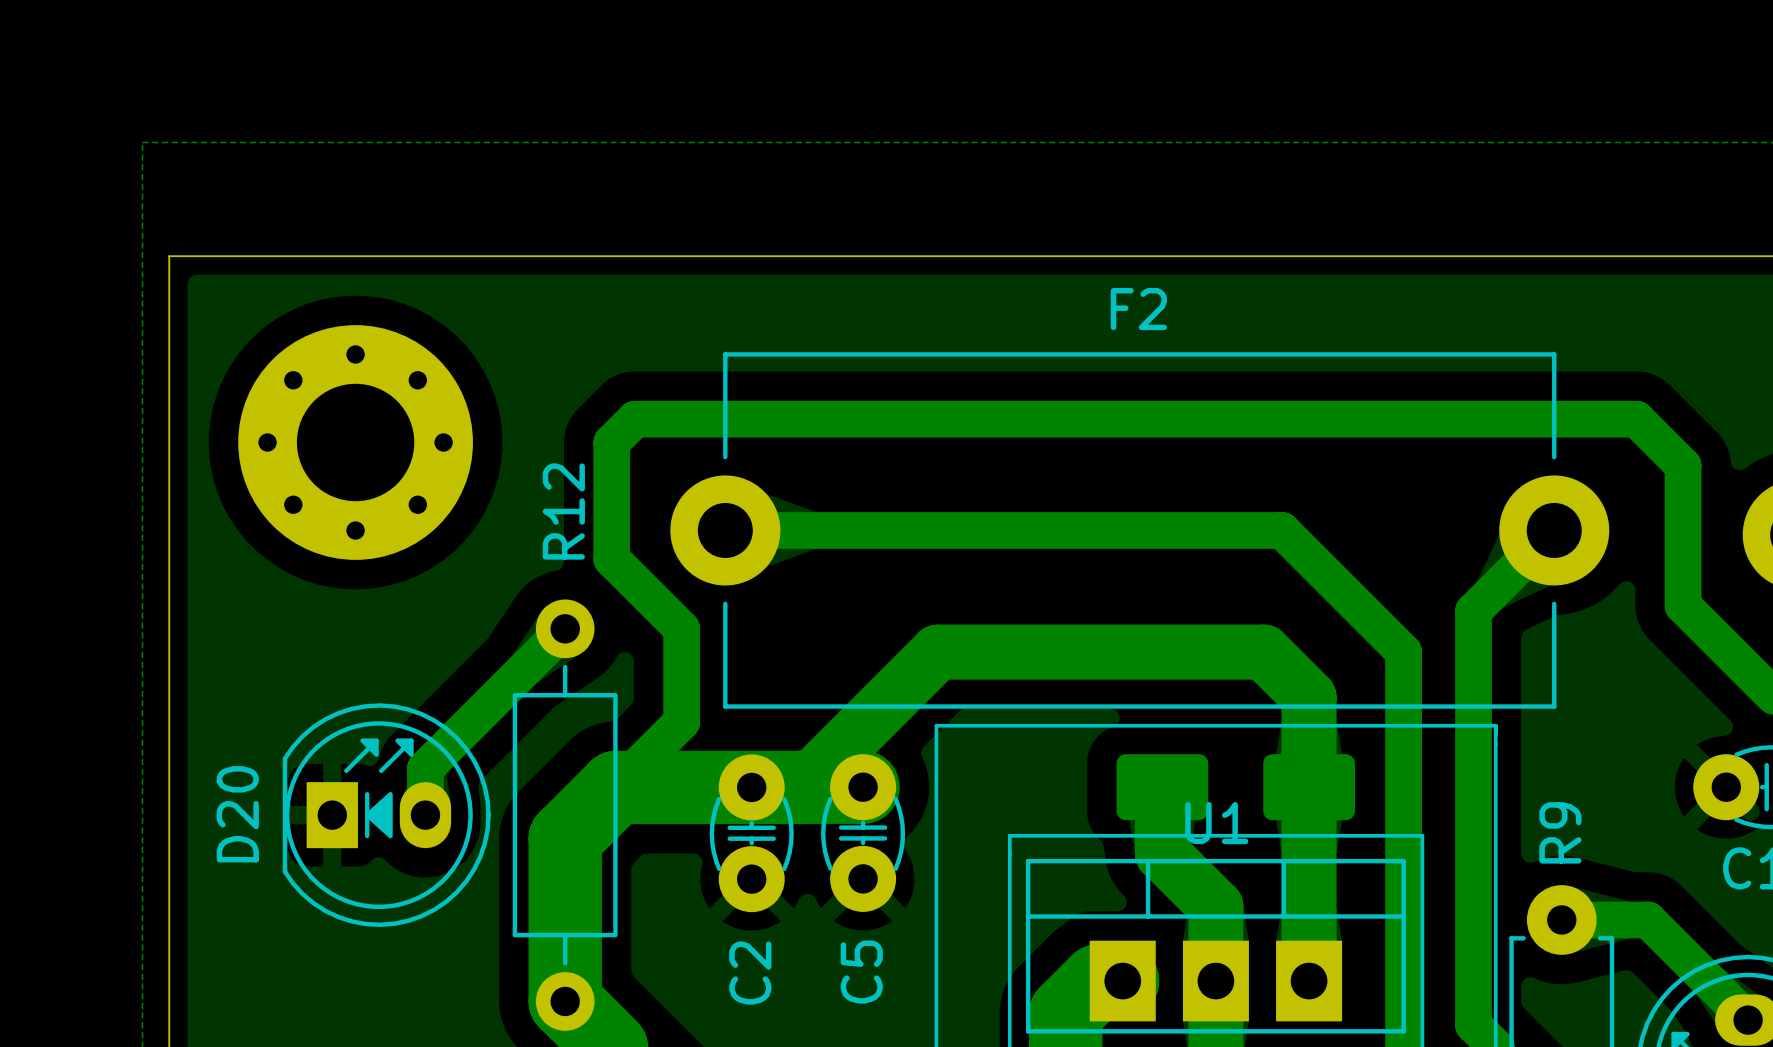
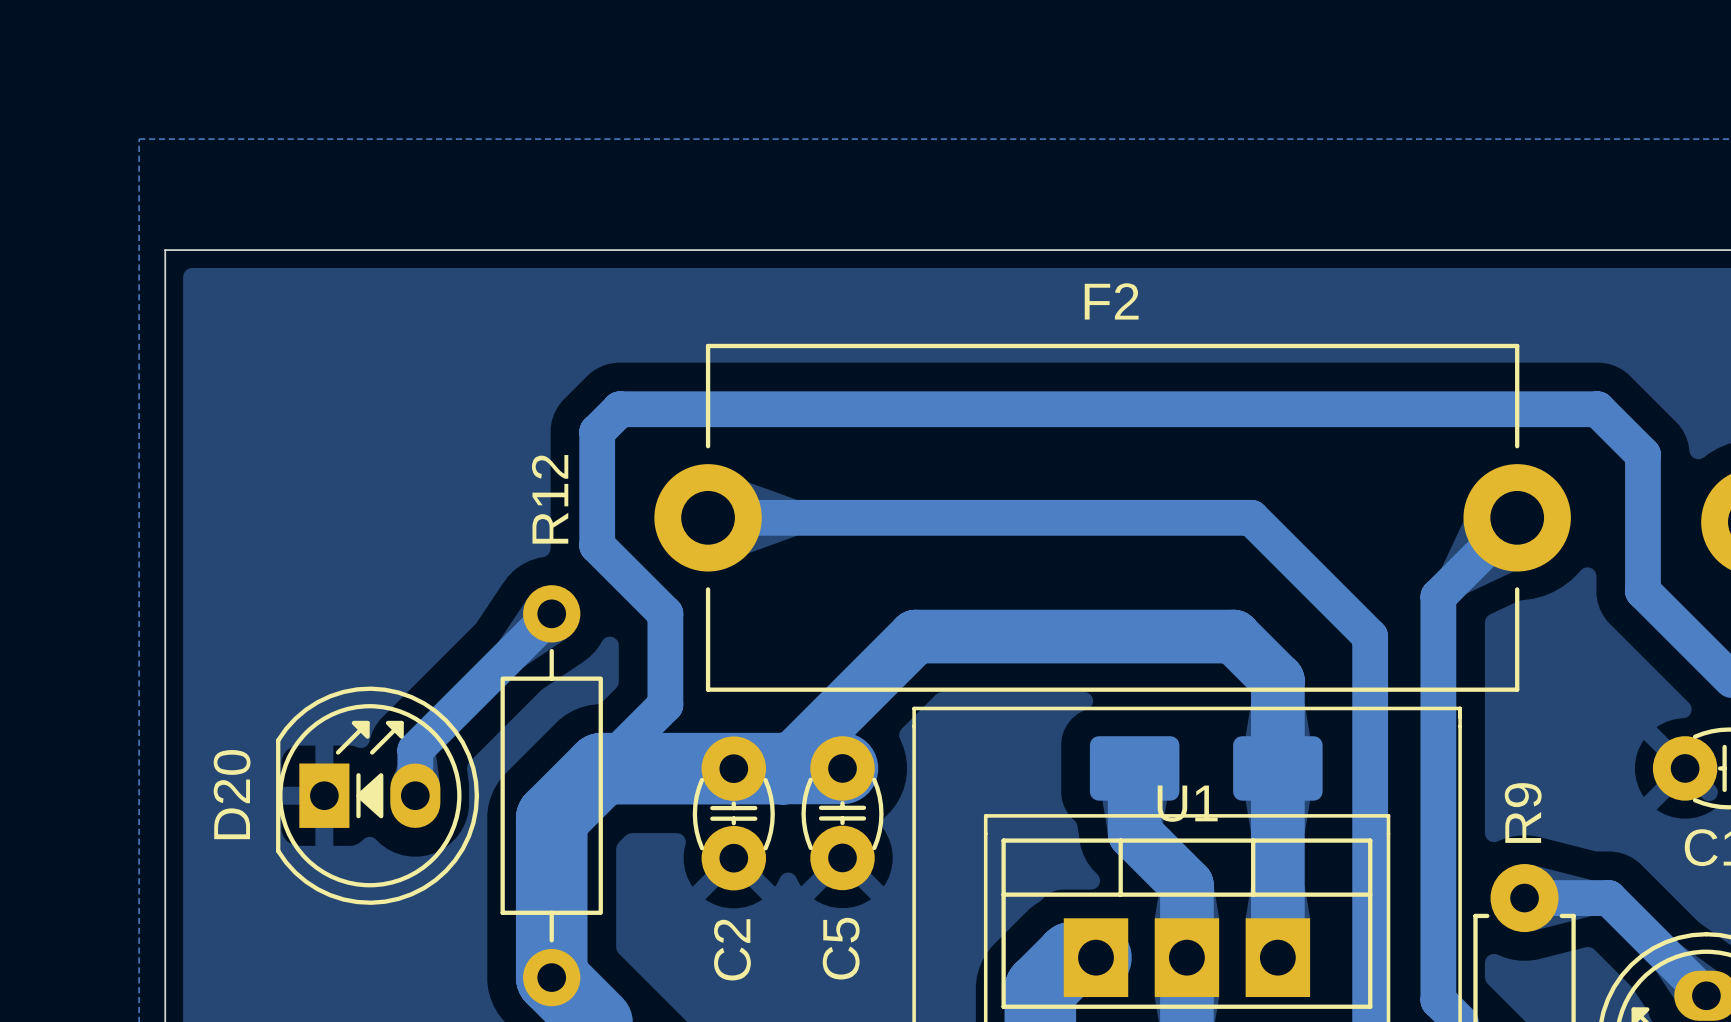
part: (355, 442) -> none

